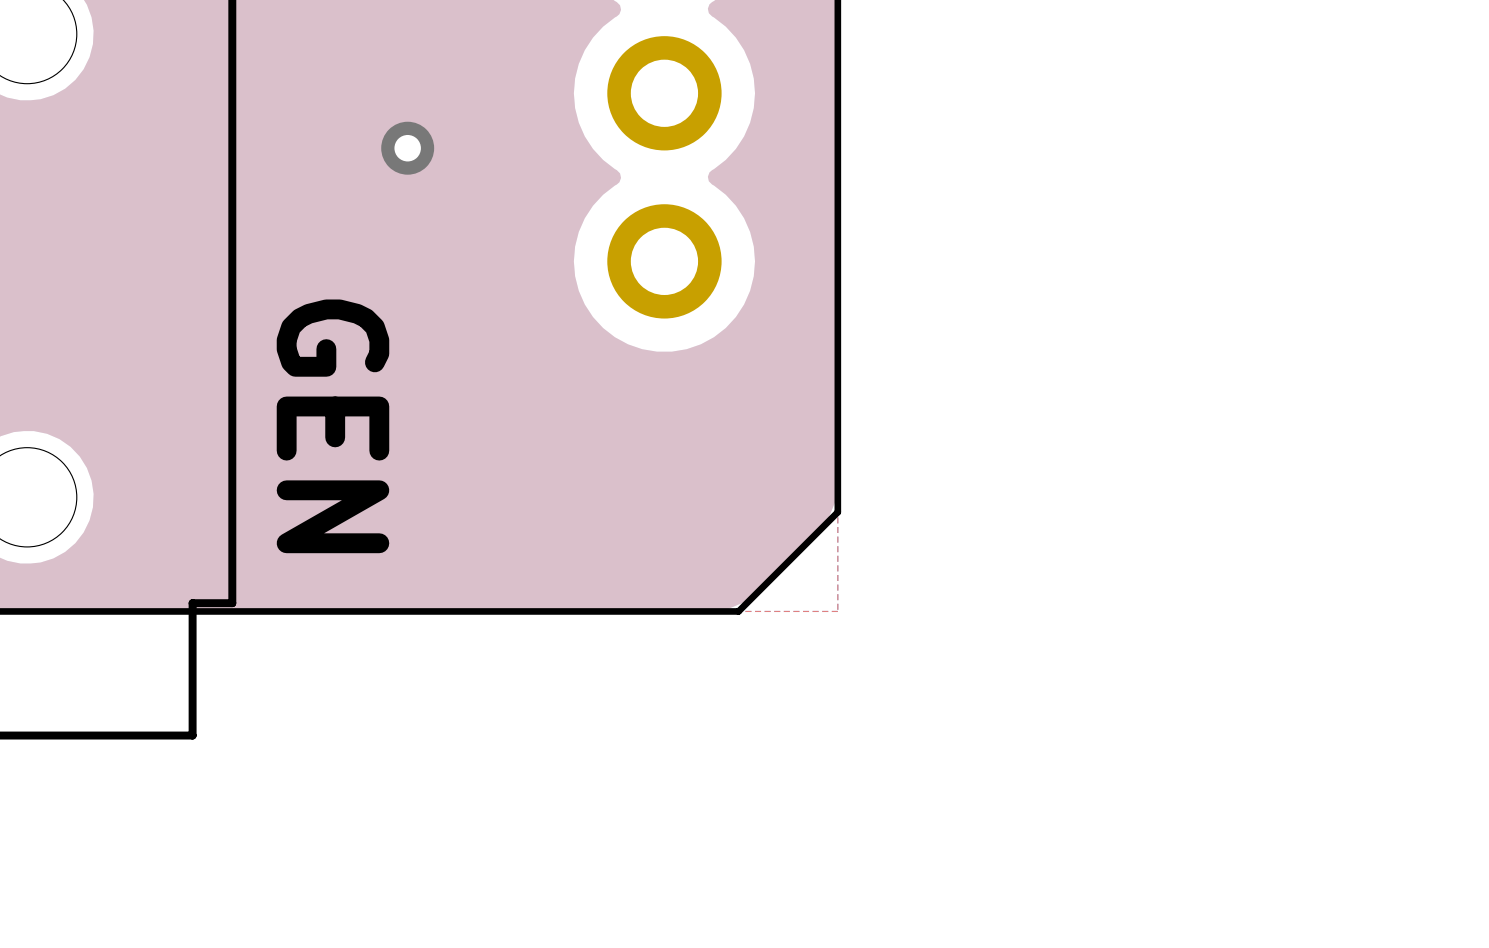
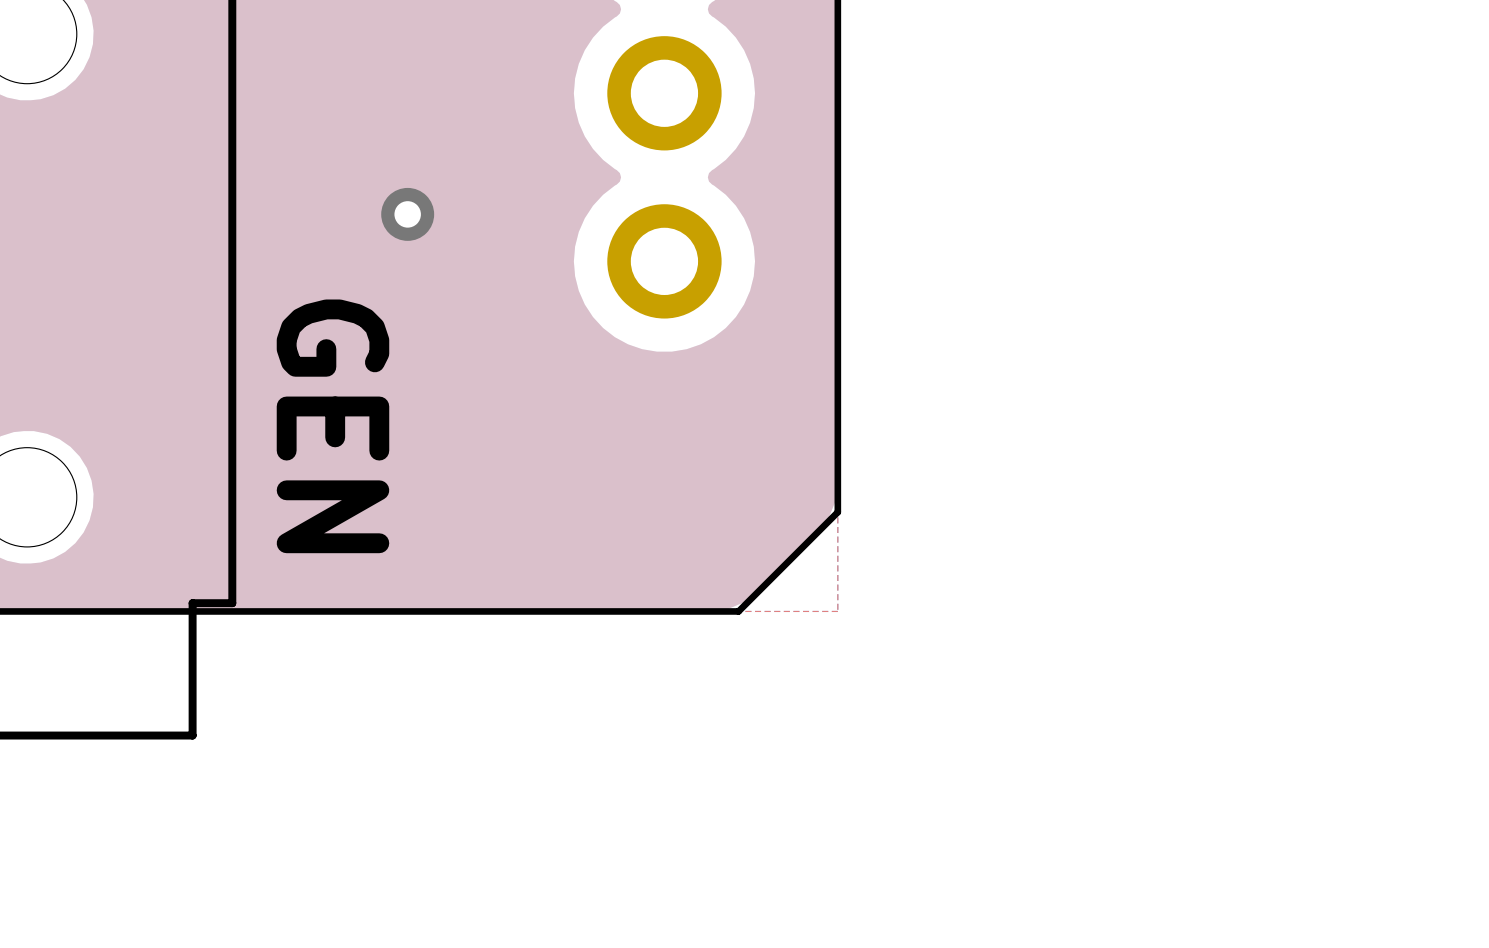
via position: (407, 148) -> (407, 214)

